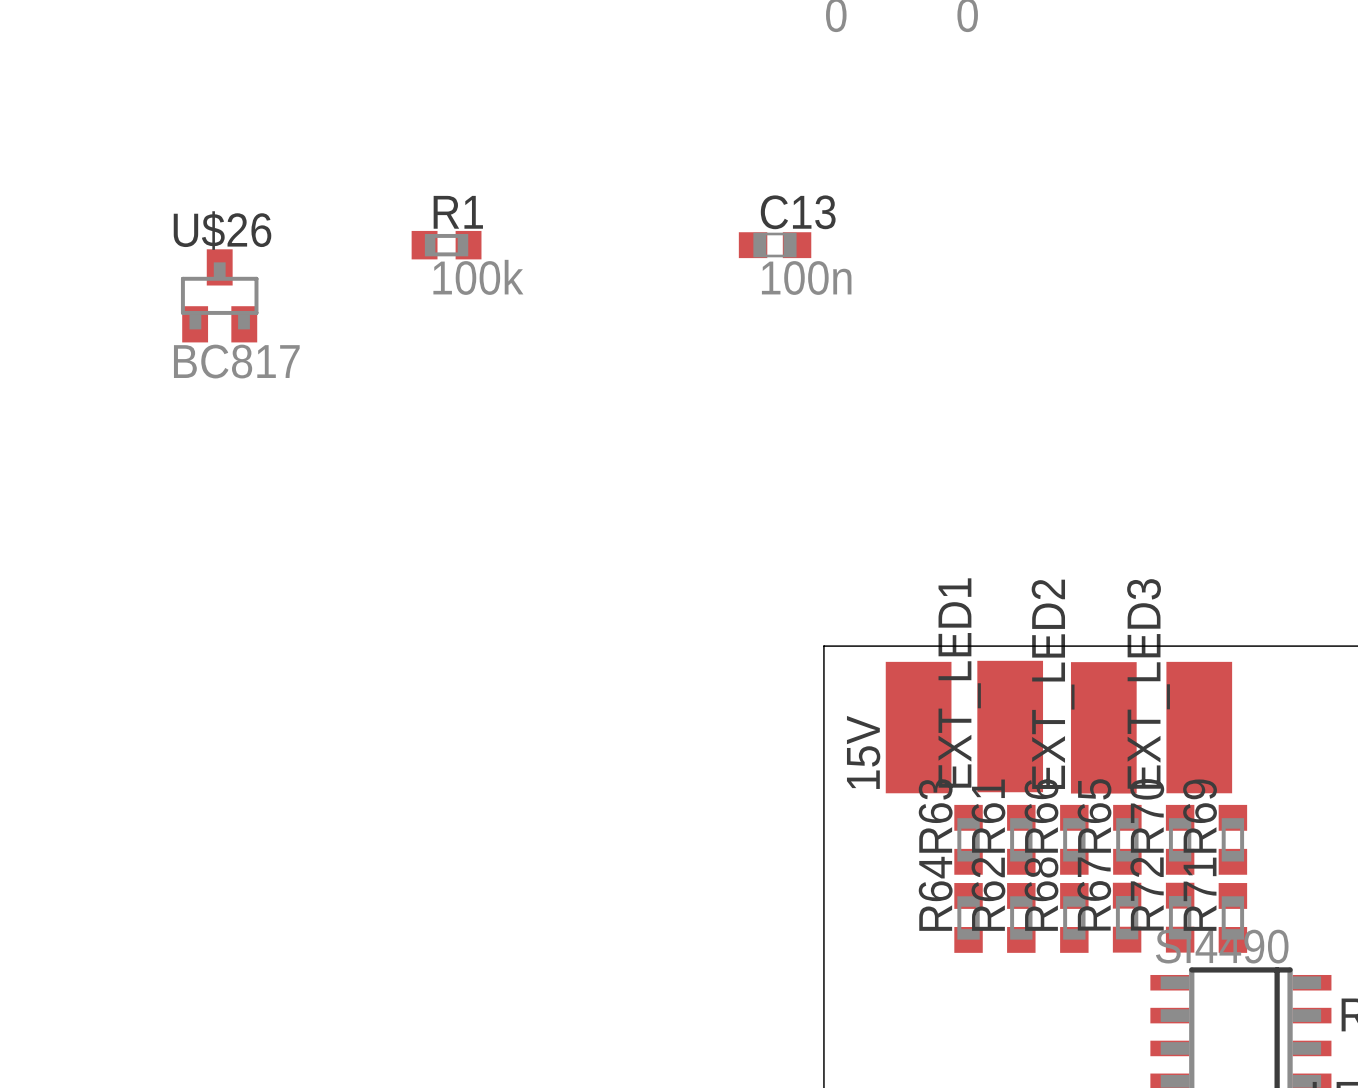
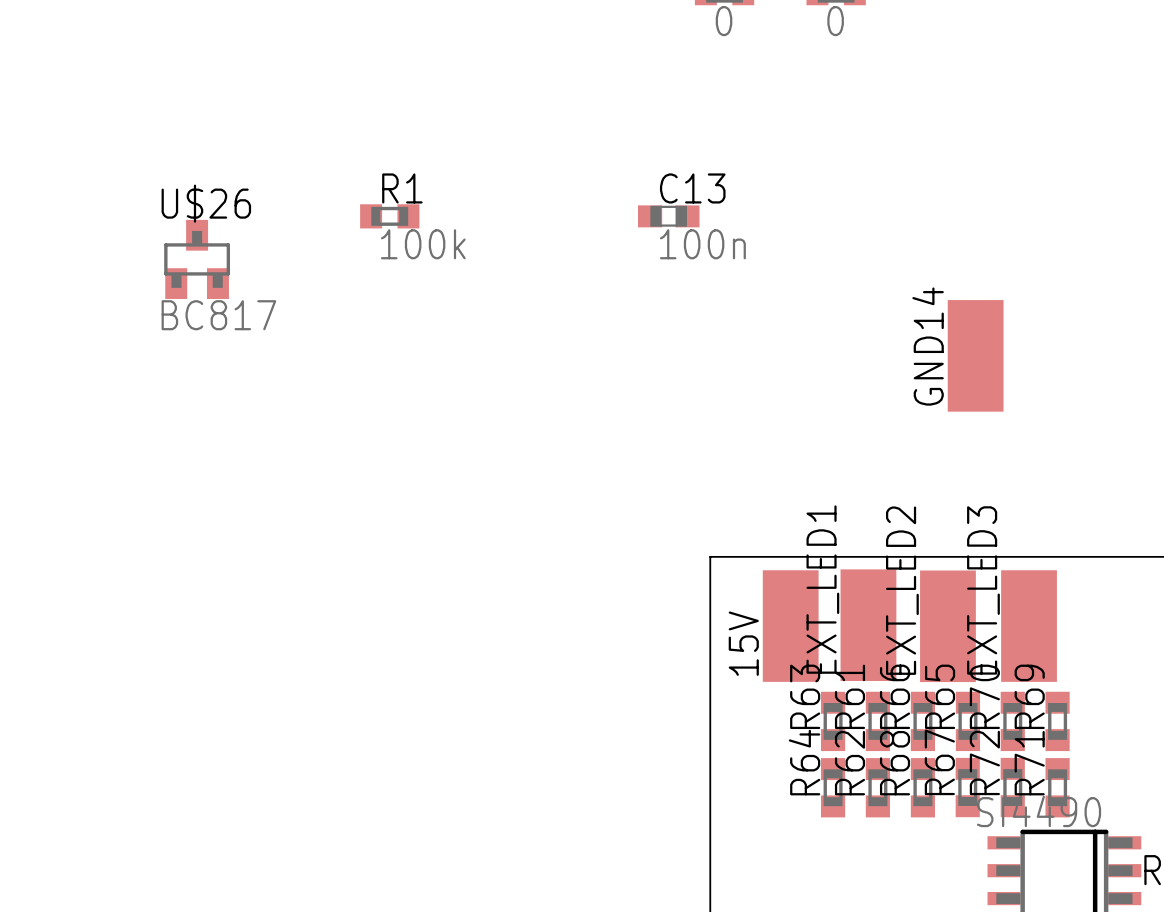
GND14: none -> (975, 355)

